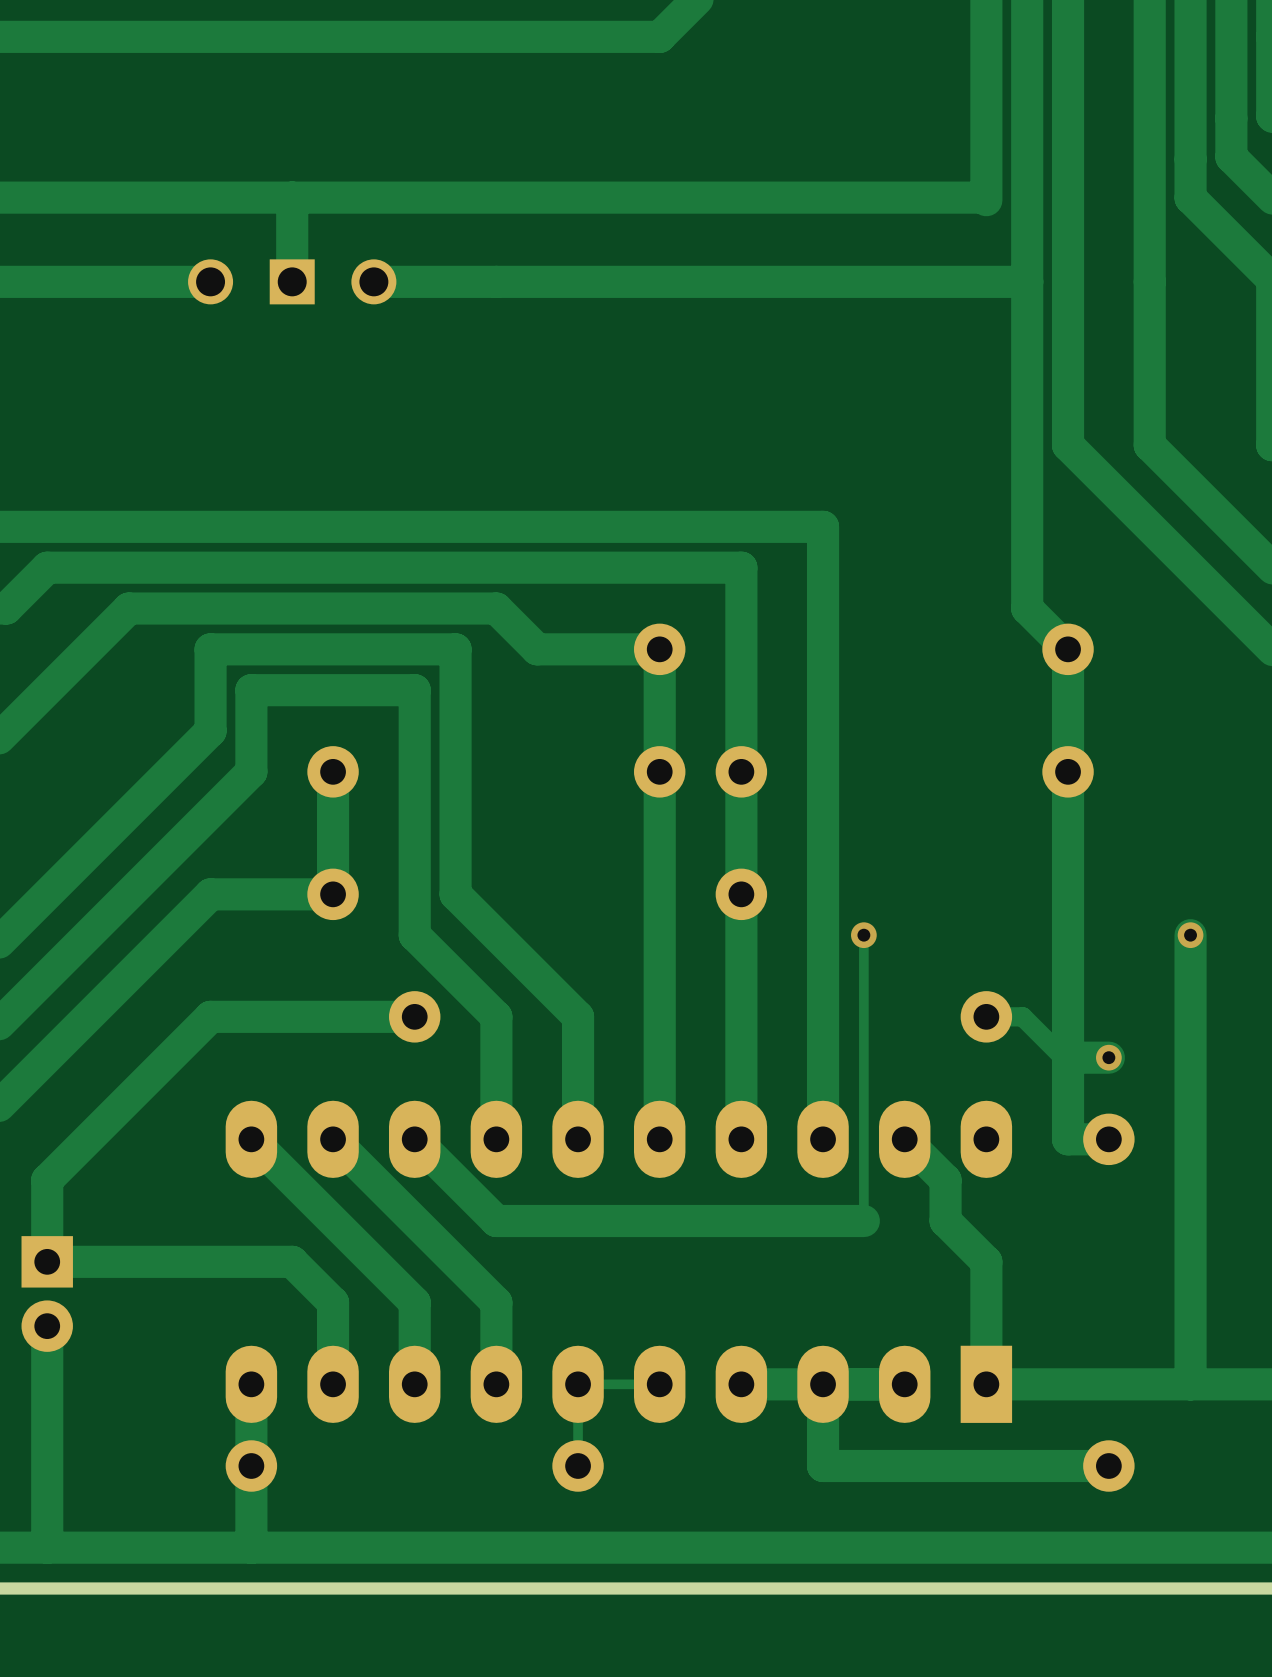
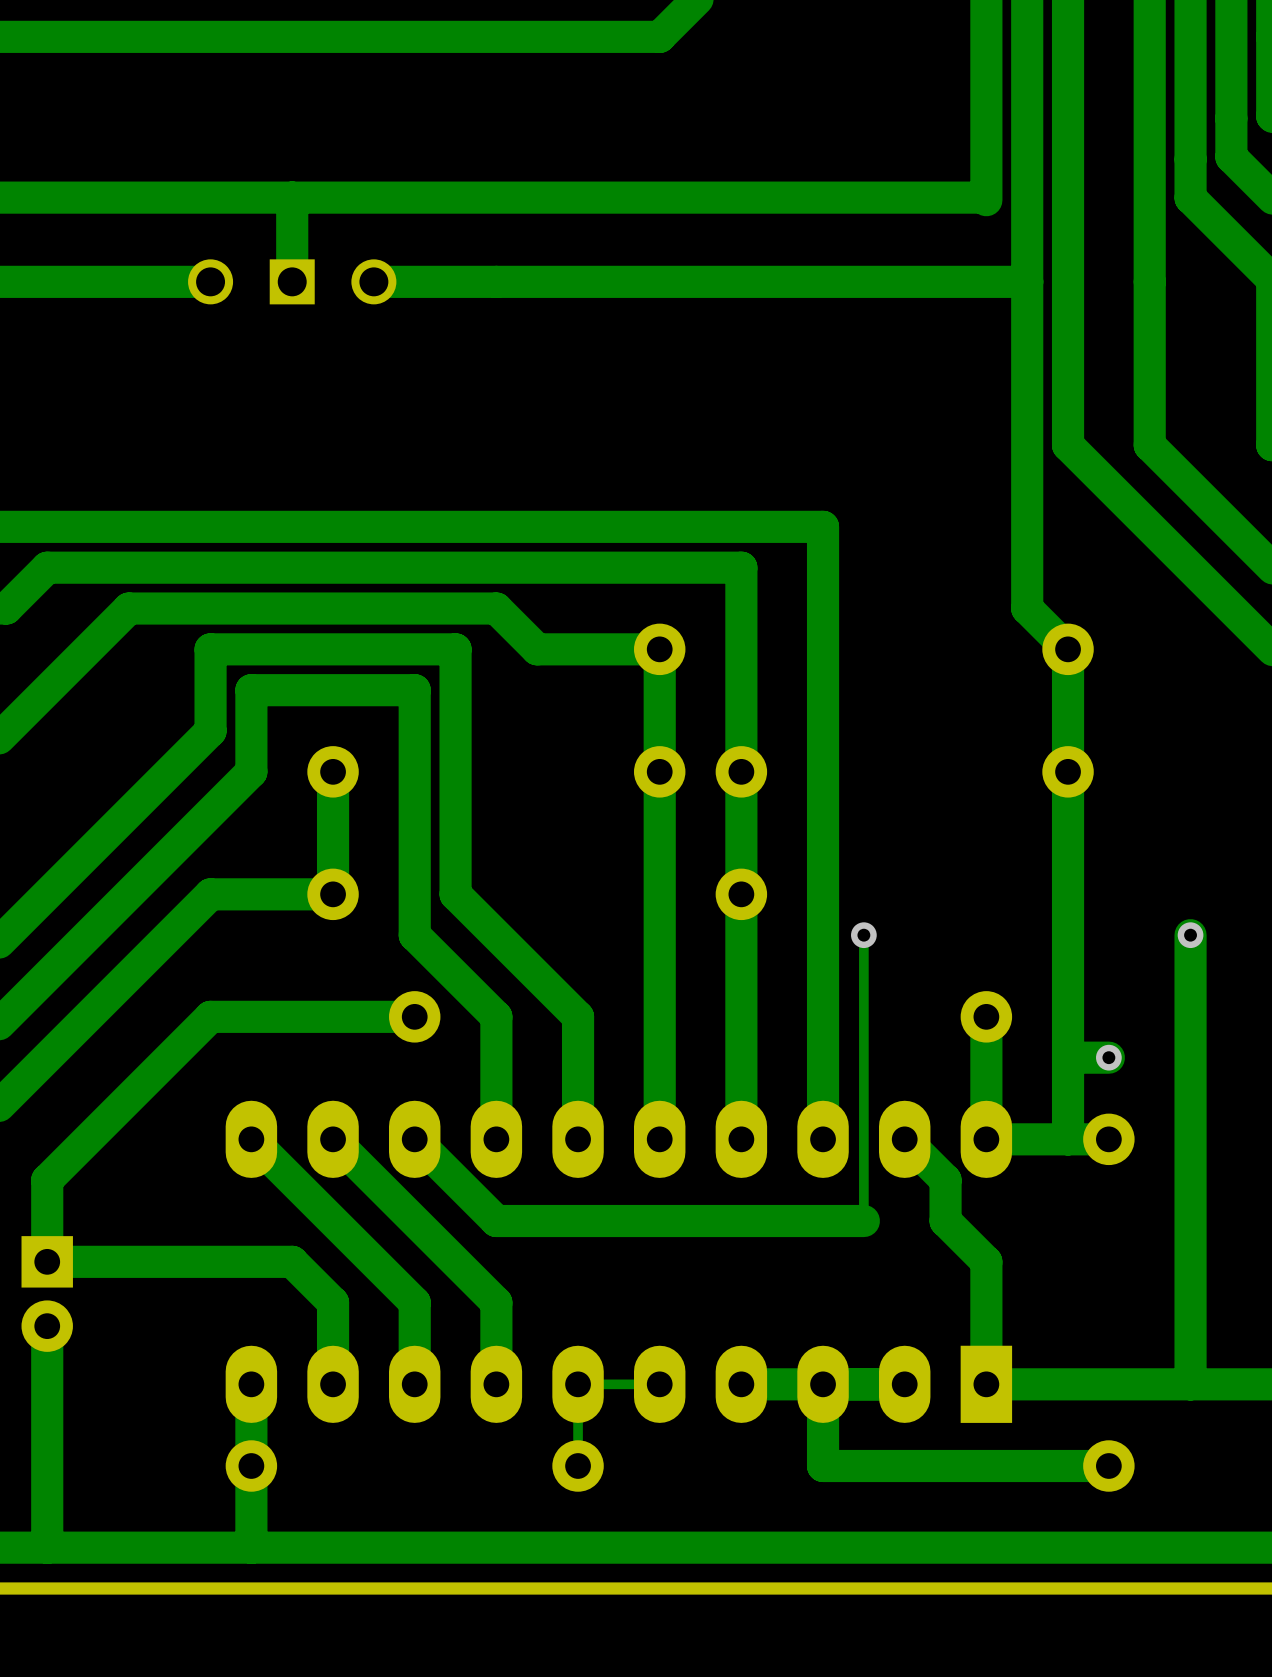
track: (986, 1016) (1022, 1016) (1063, 1057) (1068, 1057) -> (986, 1016) (986, 1139) (1068, 1139)

